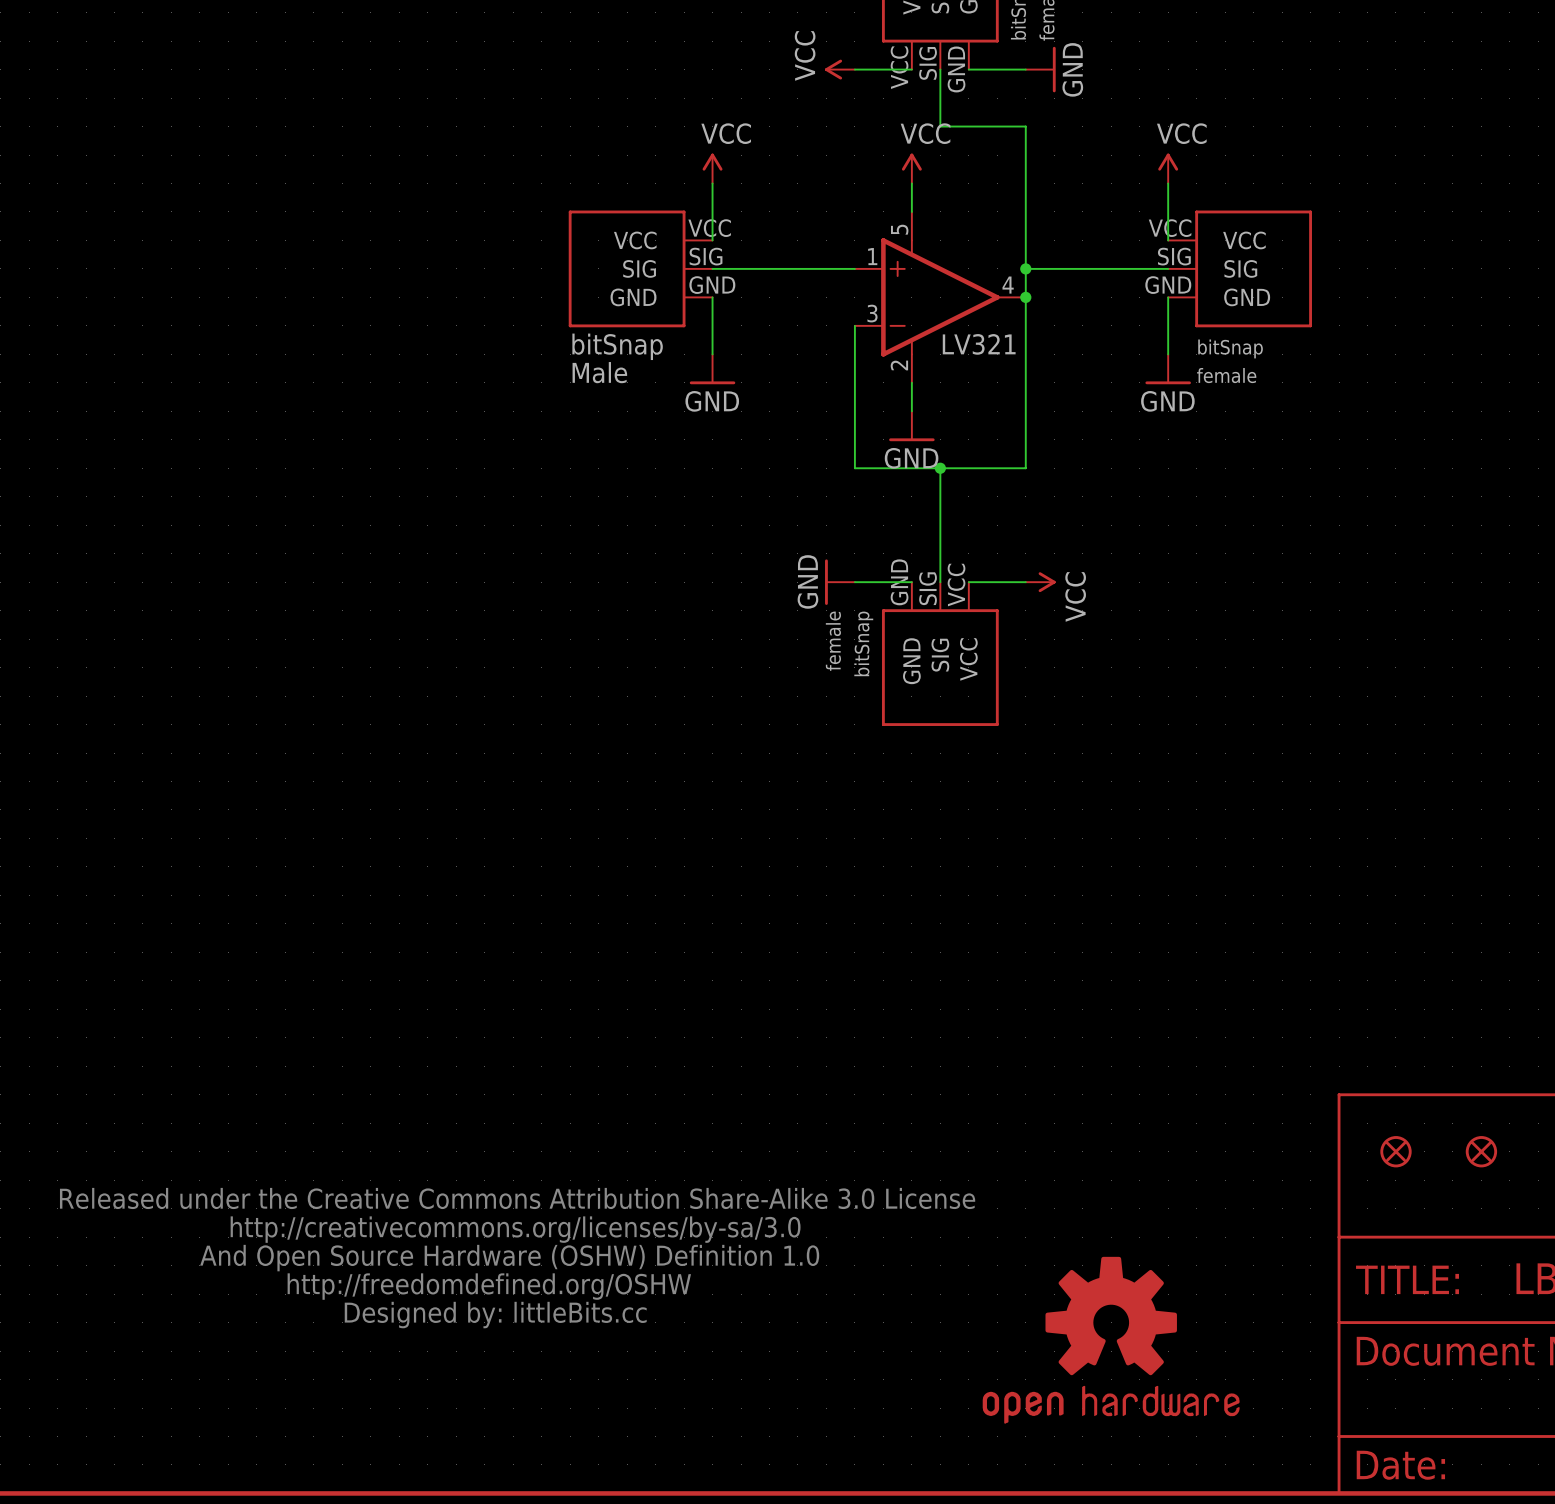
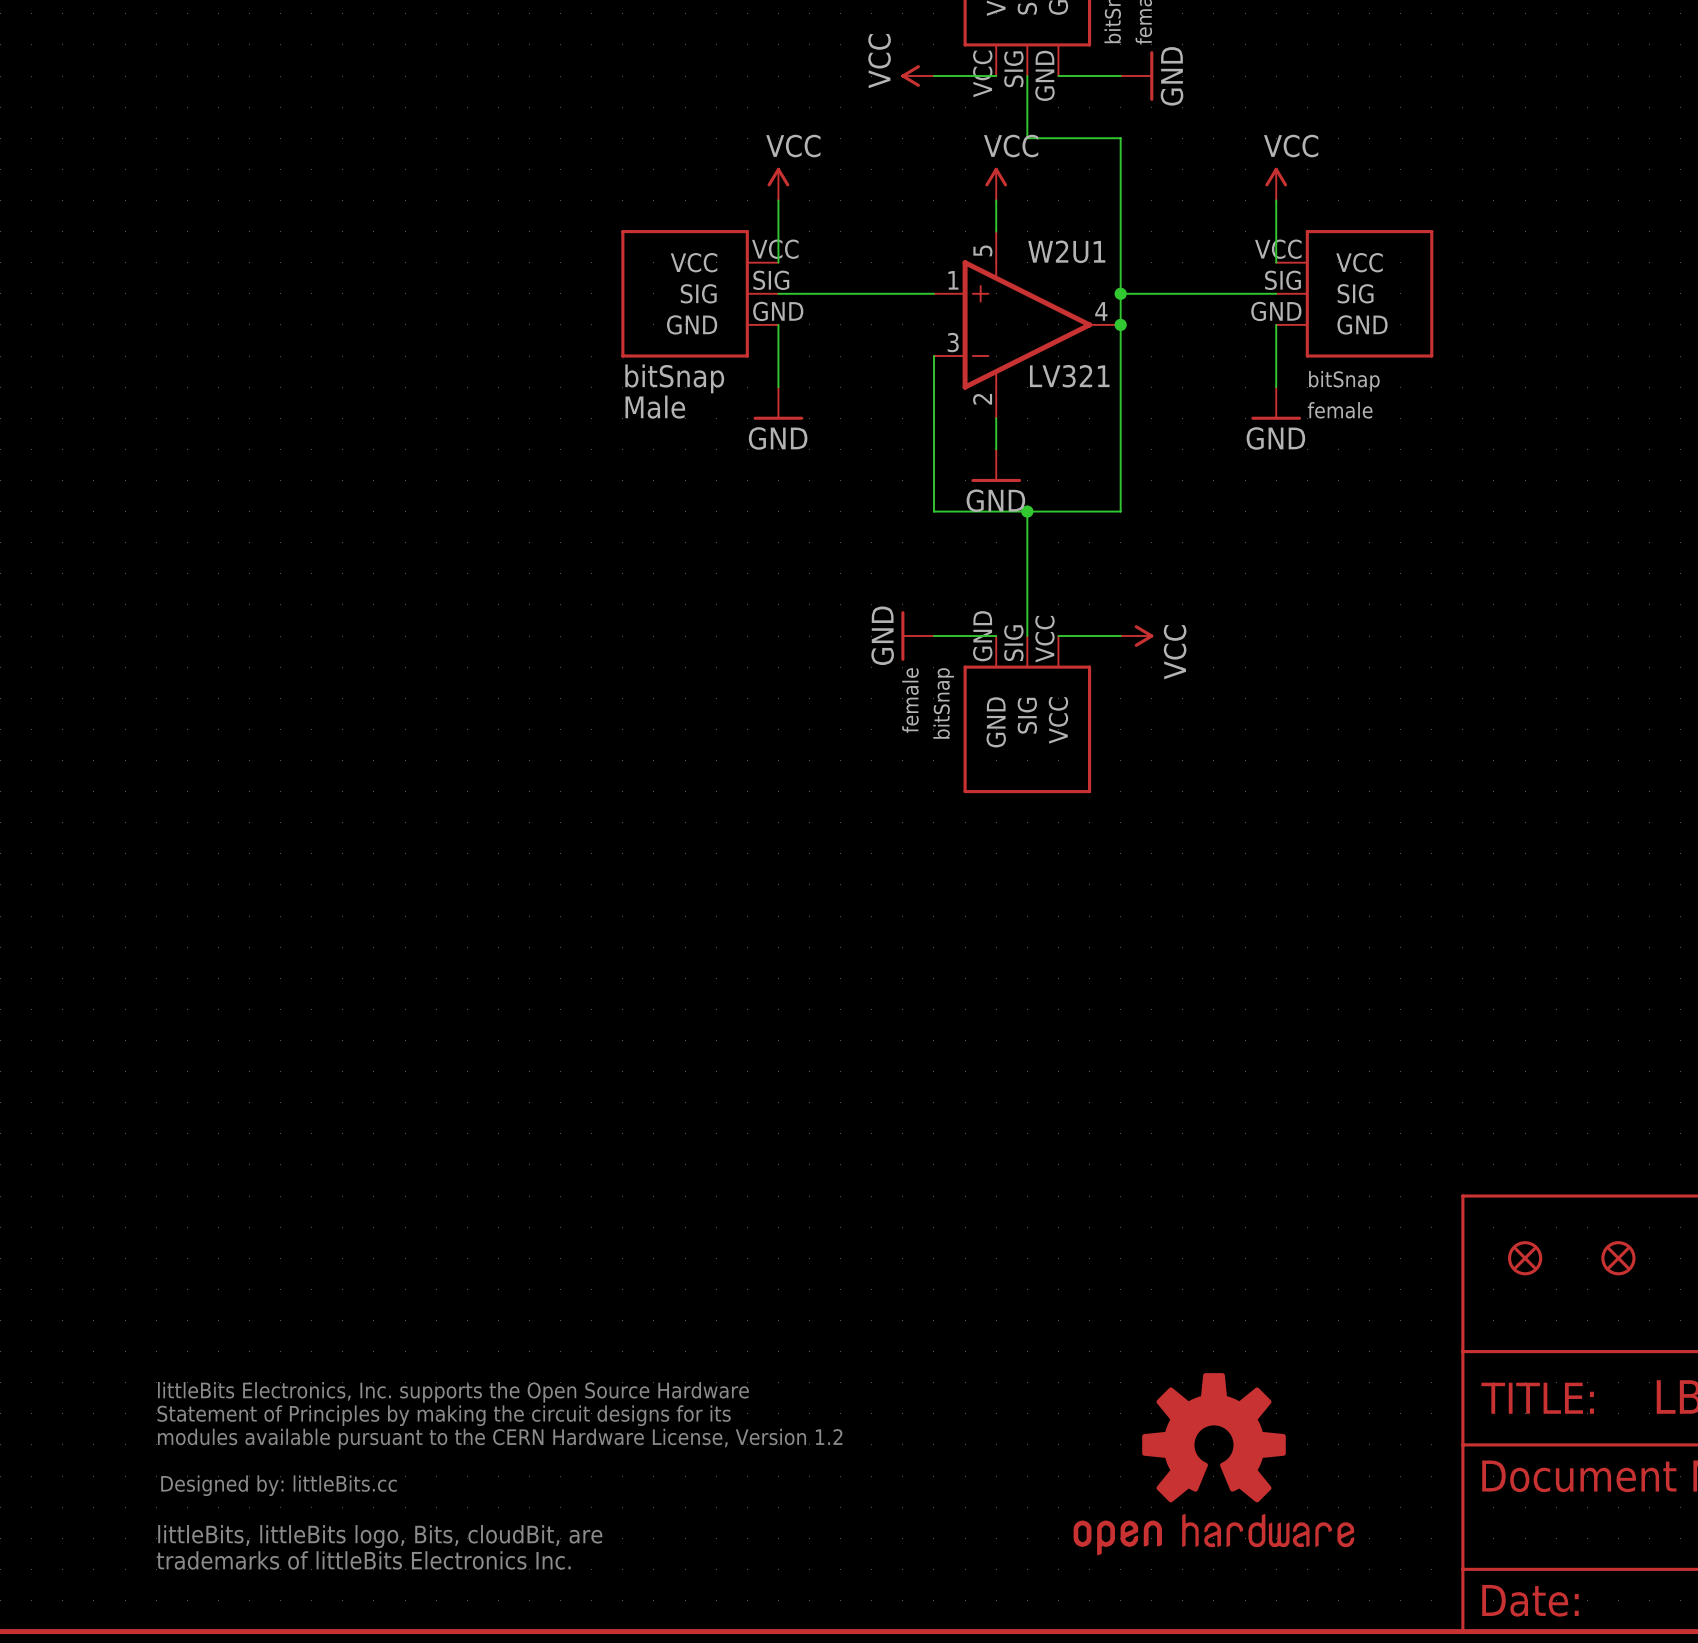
W2U1 name: none -> W2U1 (1066, 251)
part: (517, 1258) -> none
part: none -> (499, 1475)

